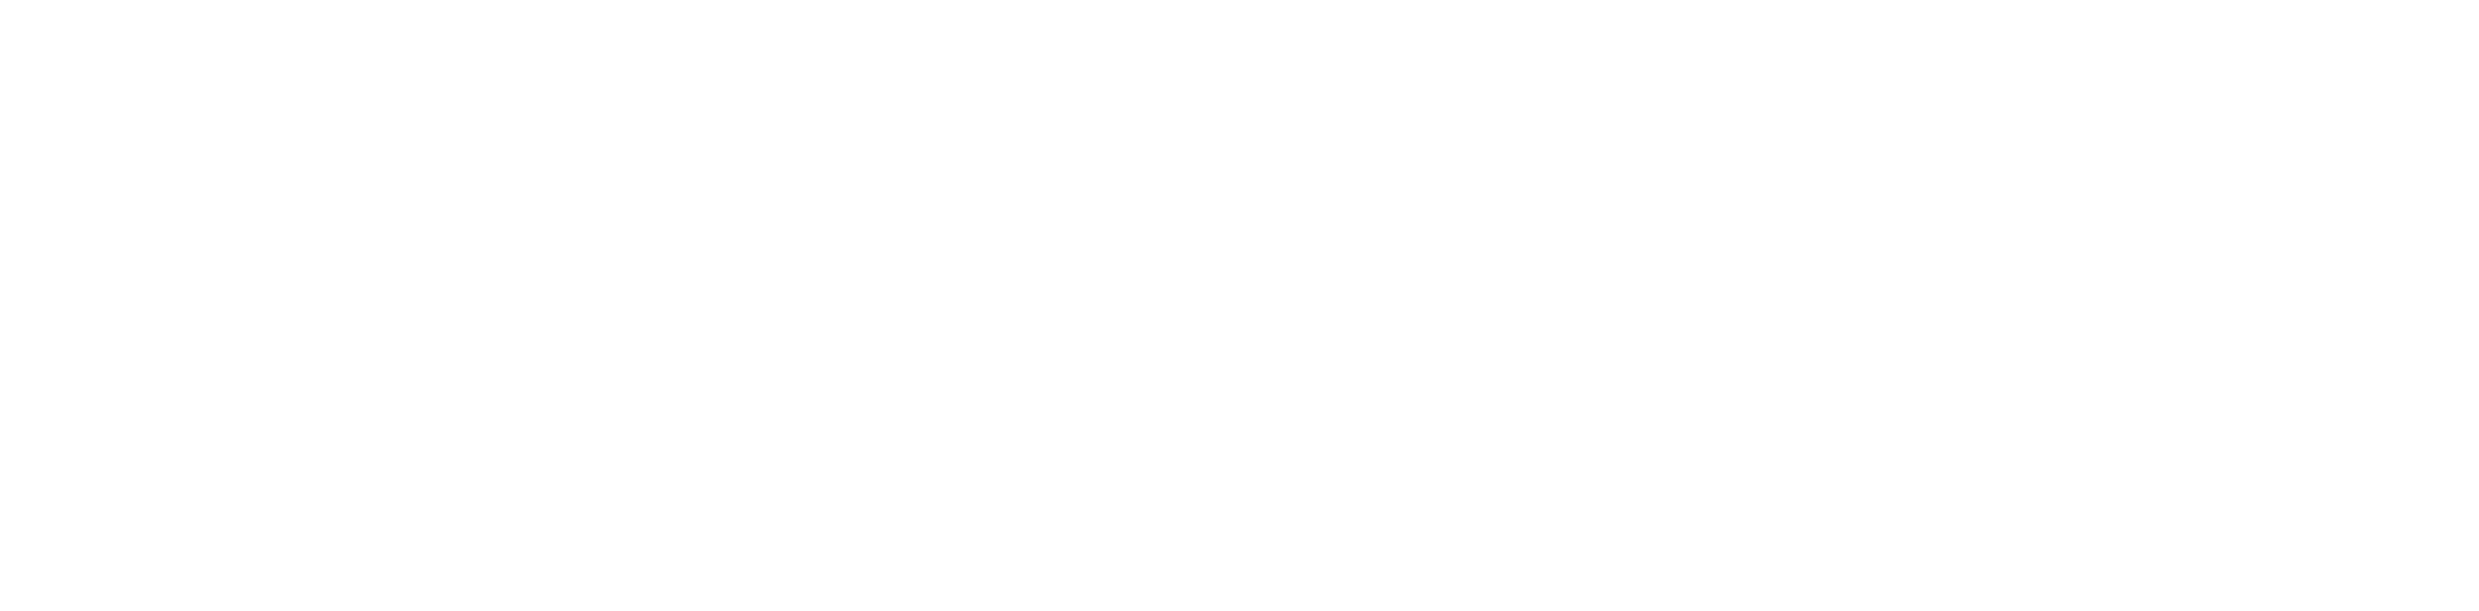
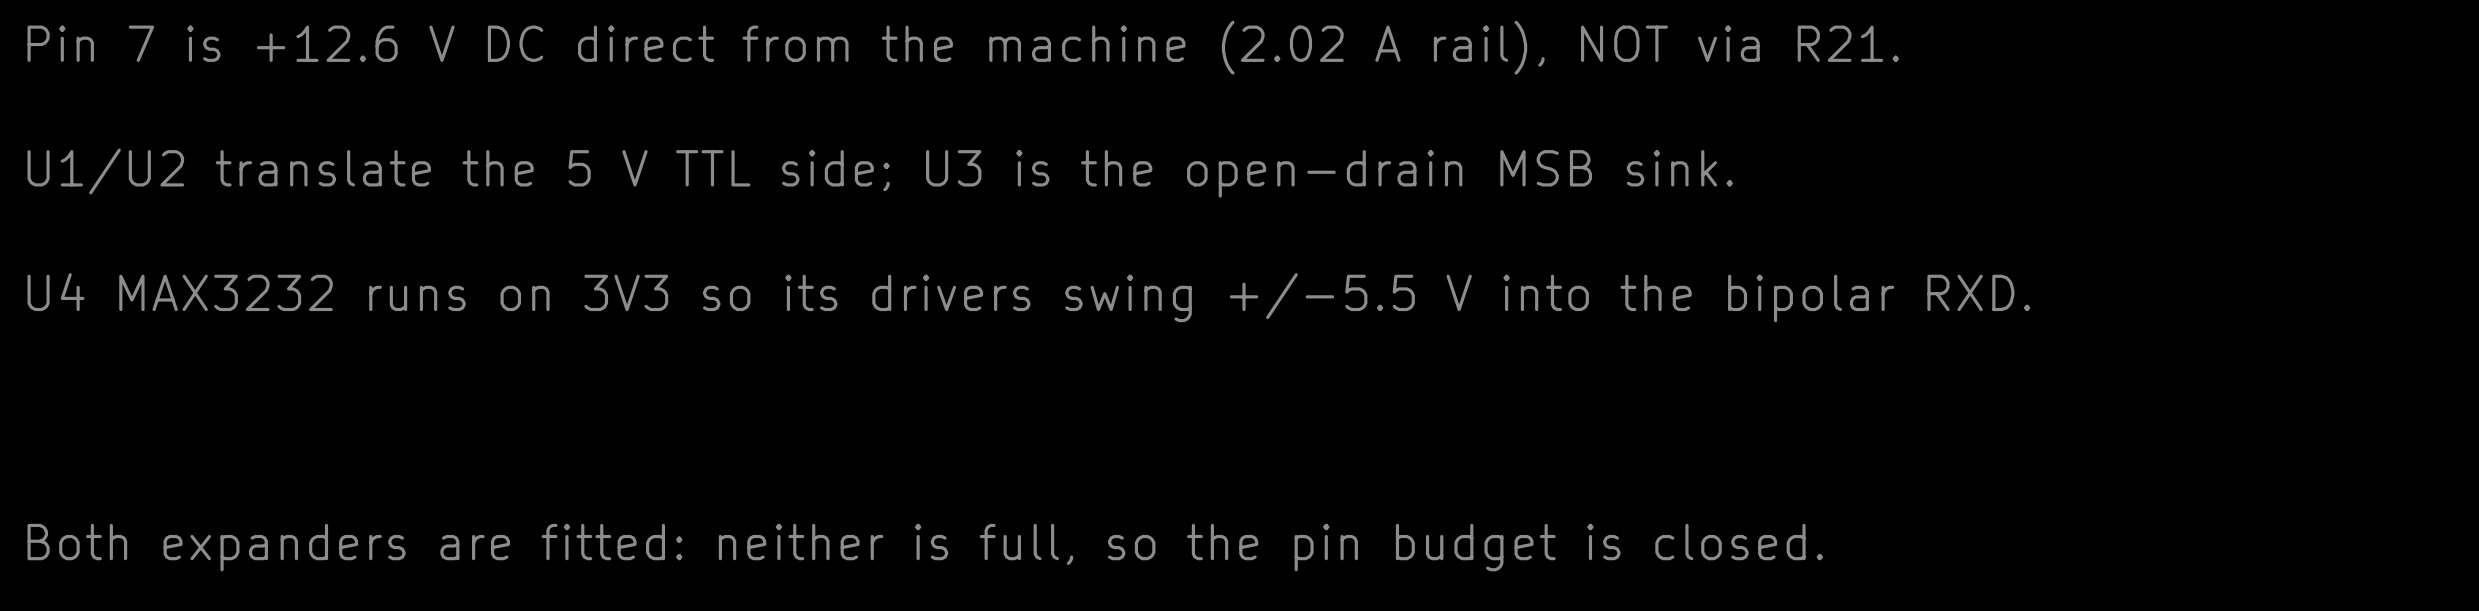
text: none -> Pin 7 is +12.6 V DC direct from the machine (2.02 A rail), NOT via R21. (963, 47)
text: none -> U1/U2 translate the 5 V TTL side; U3 is the open-drain MSB sink. (880, 173)
text: none -> U4 MAX3232 runs on 3V3 so its drivers swing +/-5.5 V into the bipolar RXD. (1028, 297)
text: none -> Both expanders are fitted: neither is full, so the pin budget is closed. (925, 547)

